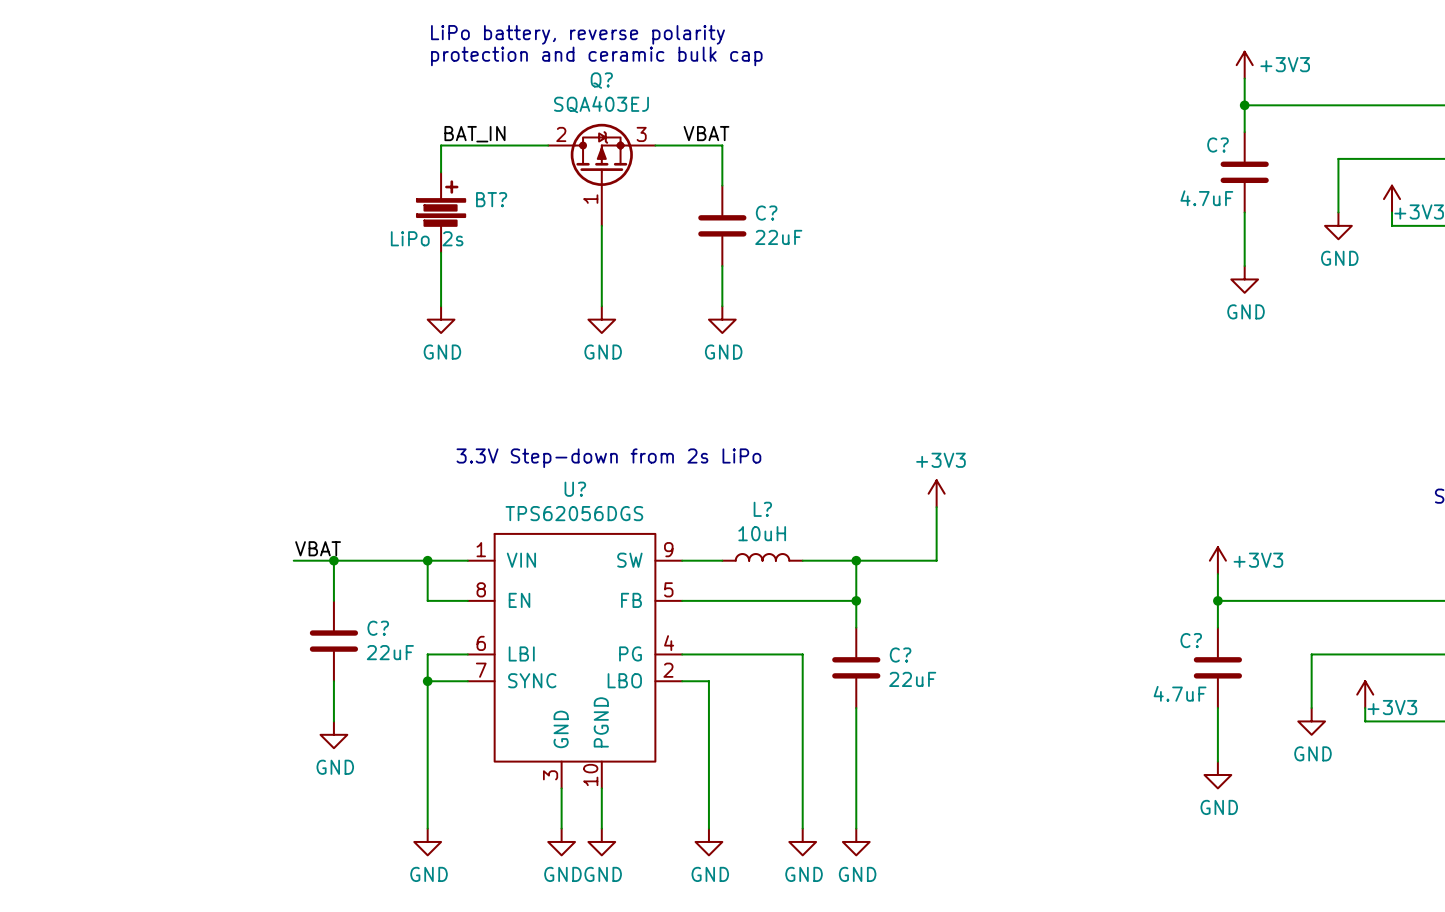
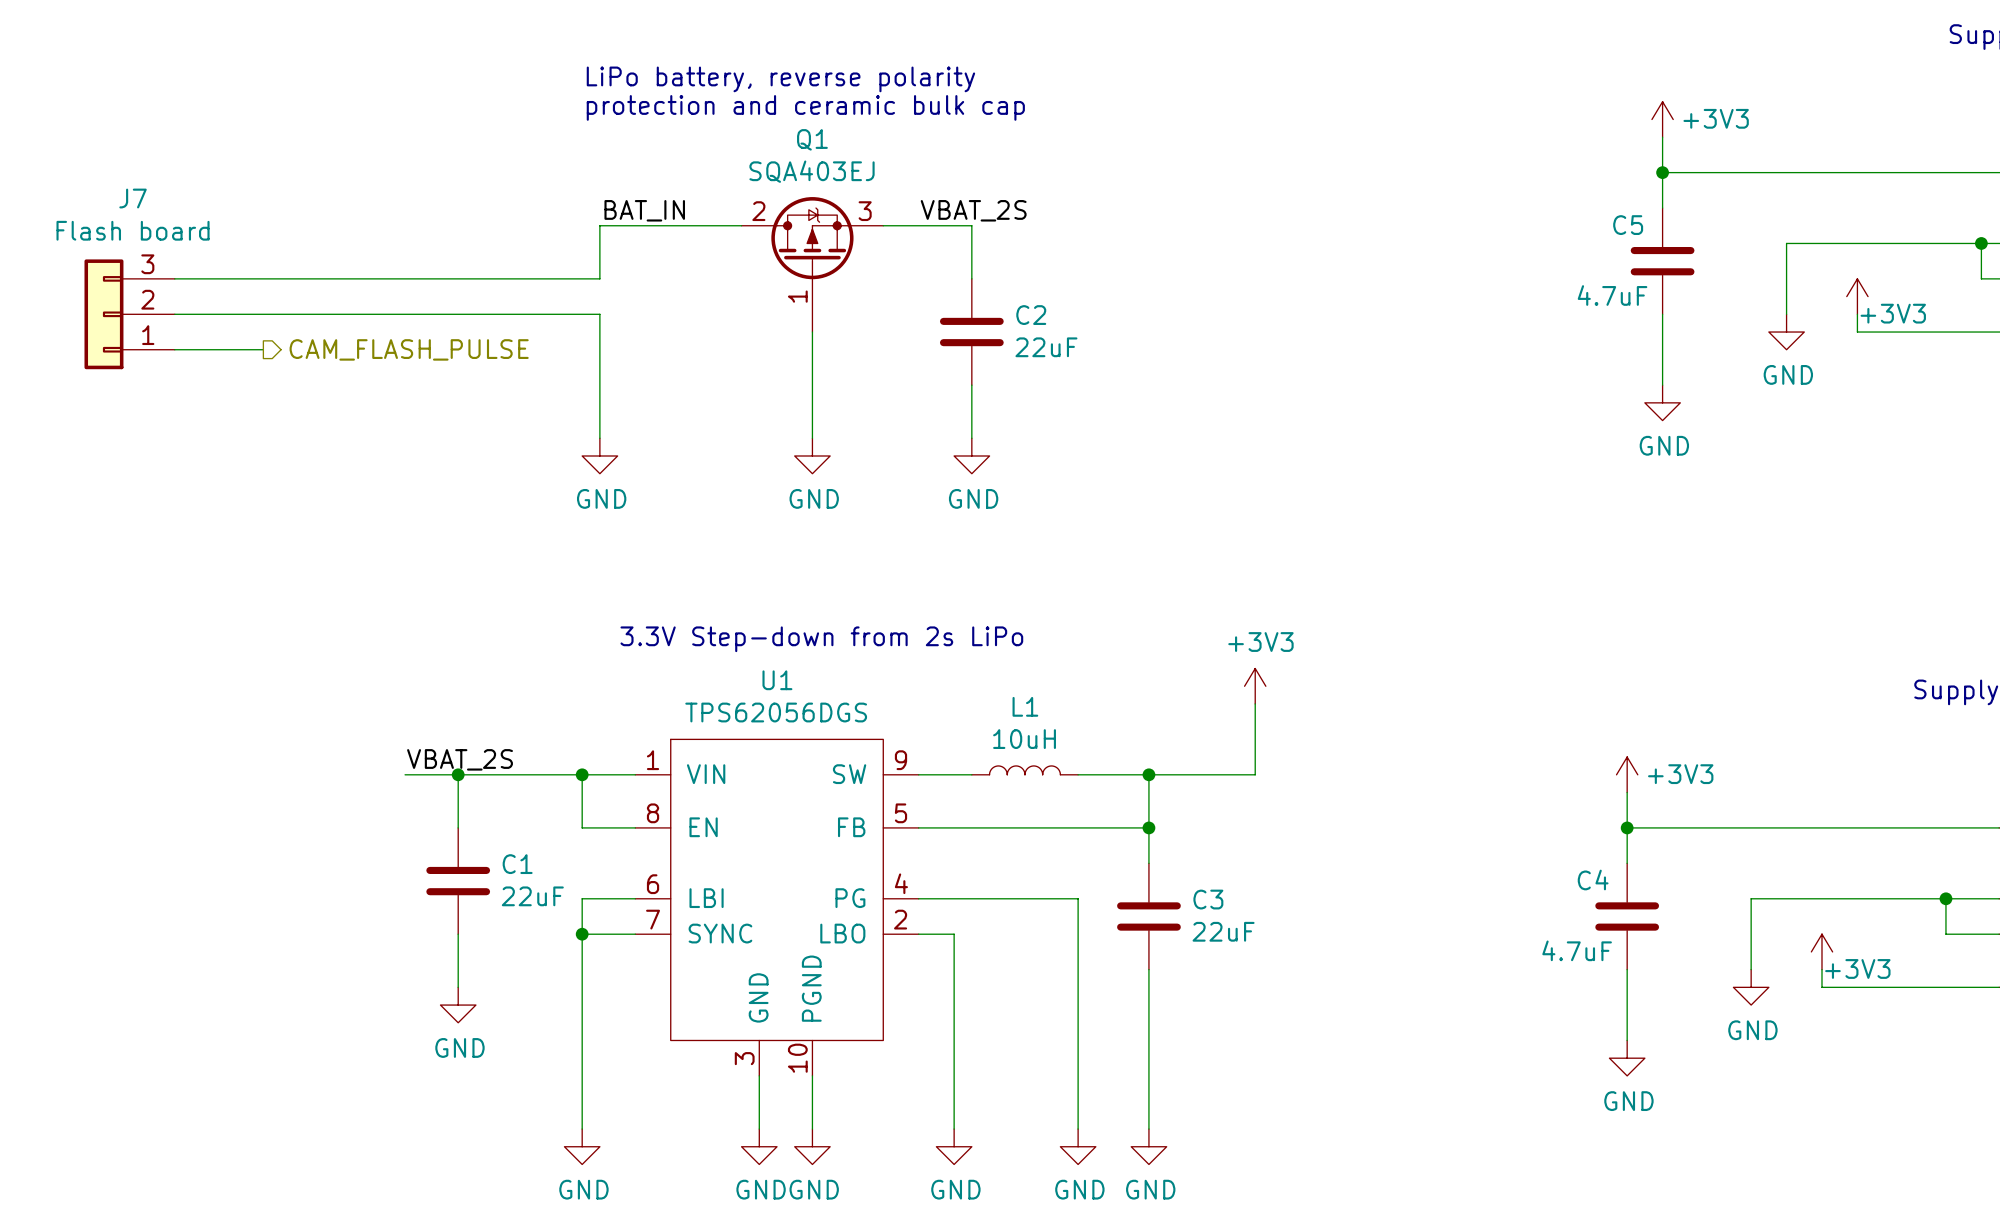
Q? name: Q? (601, 80) -> Q1 (812, 139)
label: VBAT (706, 133) -> VBAT_2S (973, 210)
C? name: C? (1218, 145) -> C5 (1628, 225)
wire: none -> (599, 261) (599, 278) (174, 278)
J7: none -> Flash board (129, 314)
wire: none -> (174, 314) (599, 314) (599, 367)
BT?: LiPo 2s (441, 212) -> none
C? name: C? (766, 213) -> C2 (1031, 315)
wire: none -> (174, 349) (263, 349)
hierarchical label: none -> CAM_FLASH_PULSE (409, 349)
U? name: U? (575, 489) -> U1 (777, 680)
L? name: L? (762, 509) -> L1 (1025, 706)
label: VBAT (318, 548) -> VBAT_2S (460, 759)
C? name: C? (378, 628) -> C1 (517, 864)
C? name: C? (1191, 640) -> C4 (1593, 879)
C? name: C? (900, 655) -> C3 (1208, 899)

